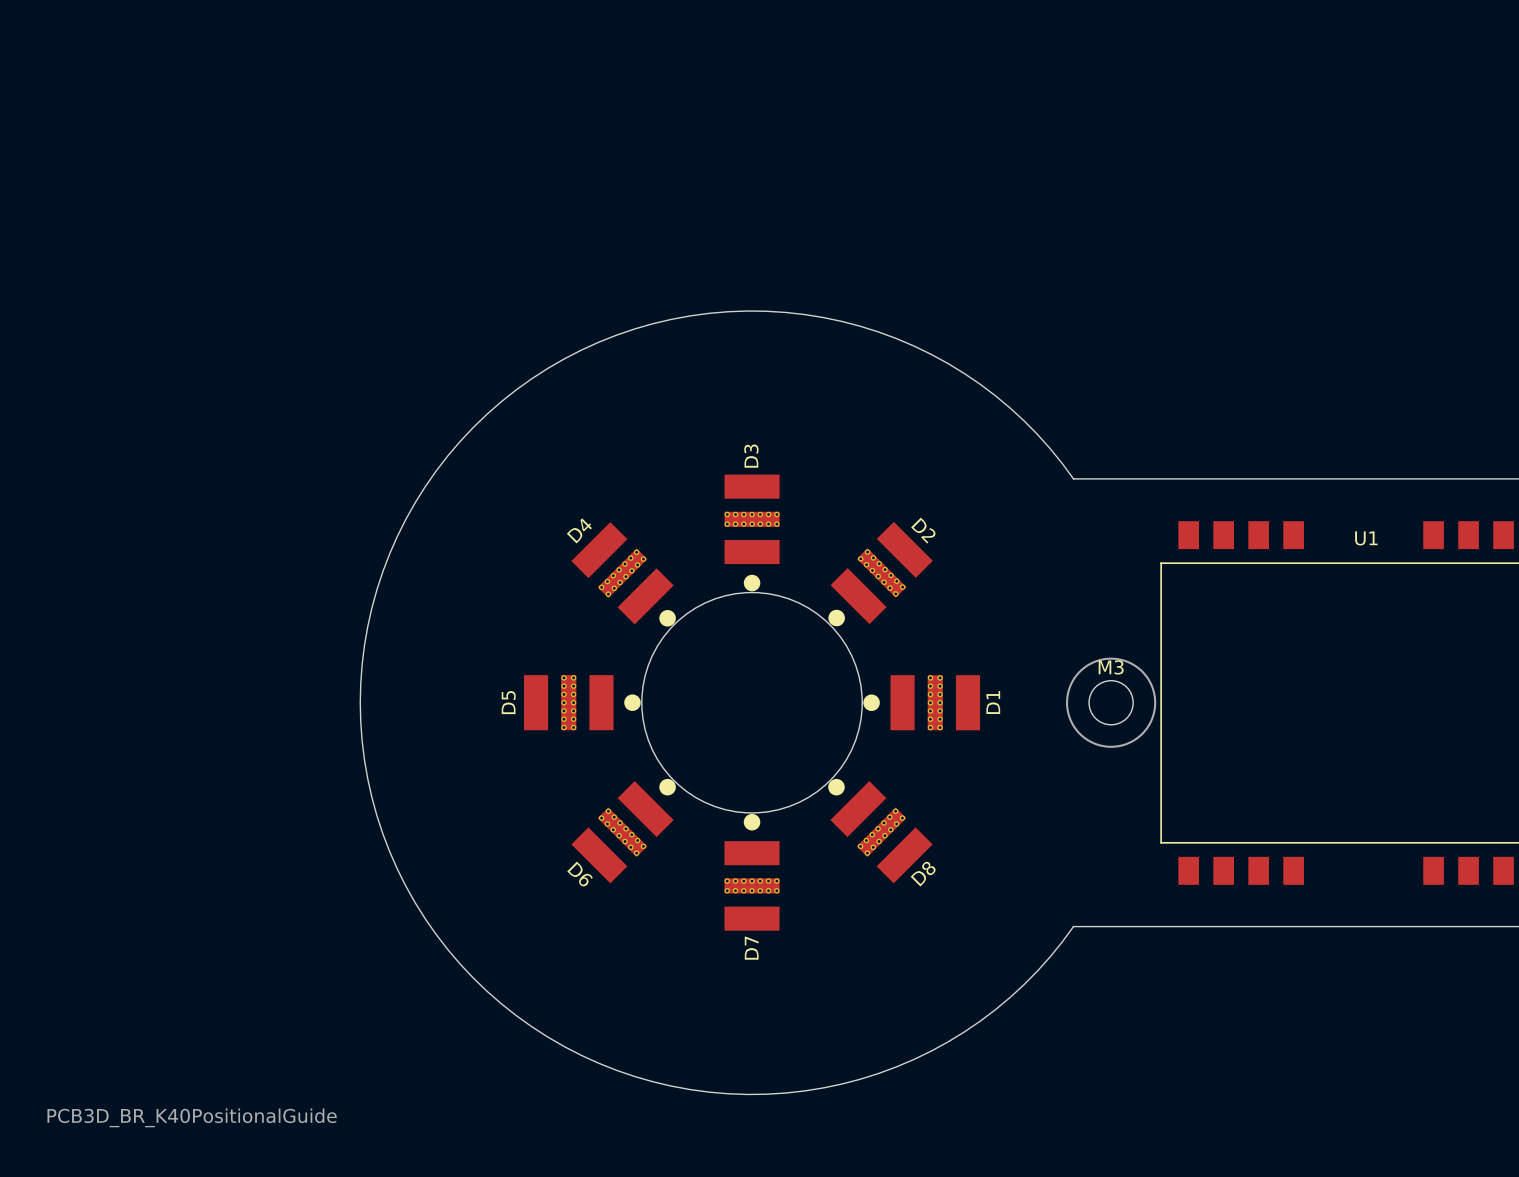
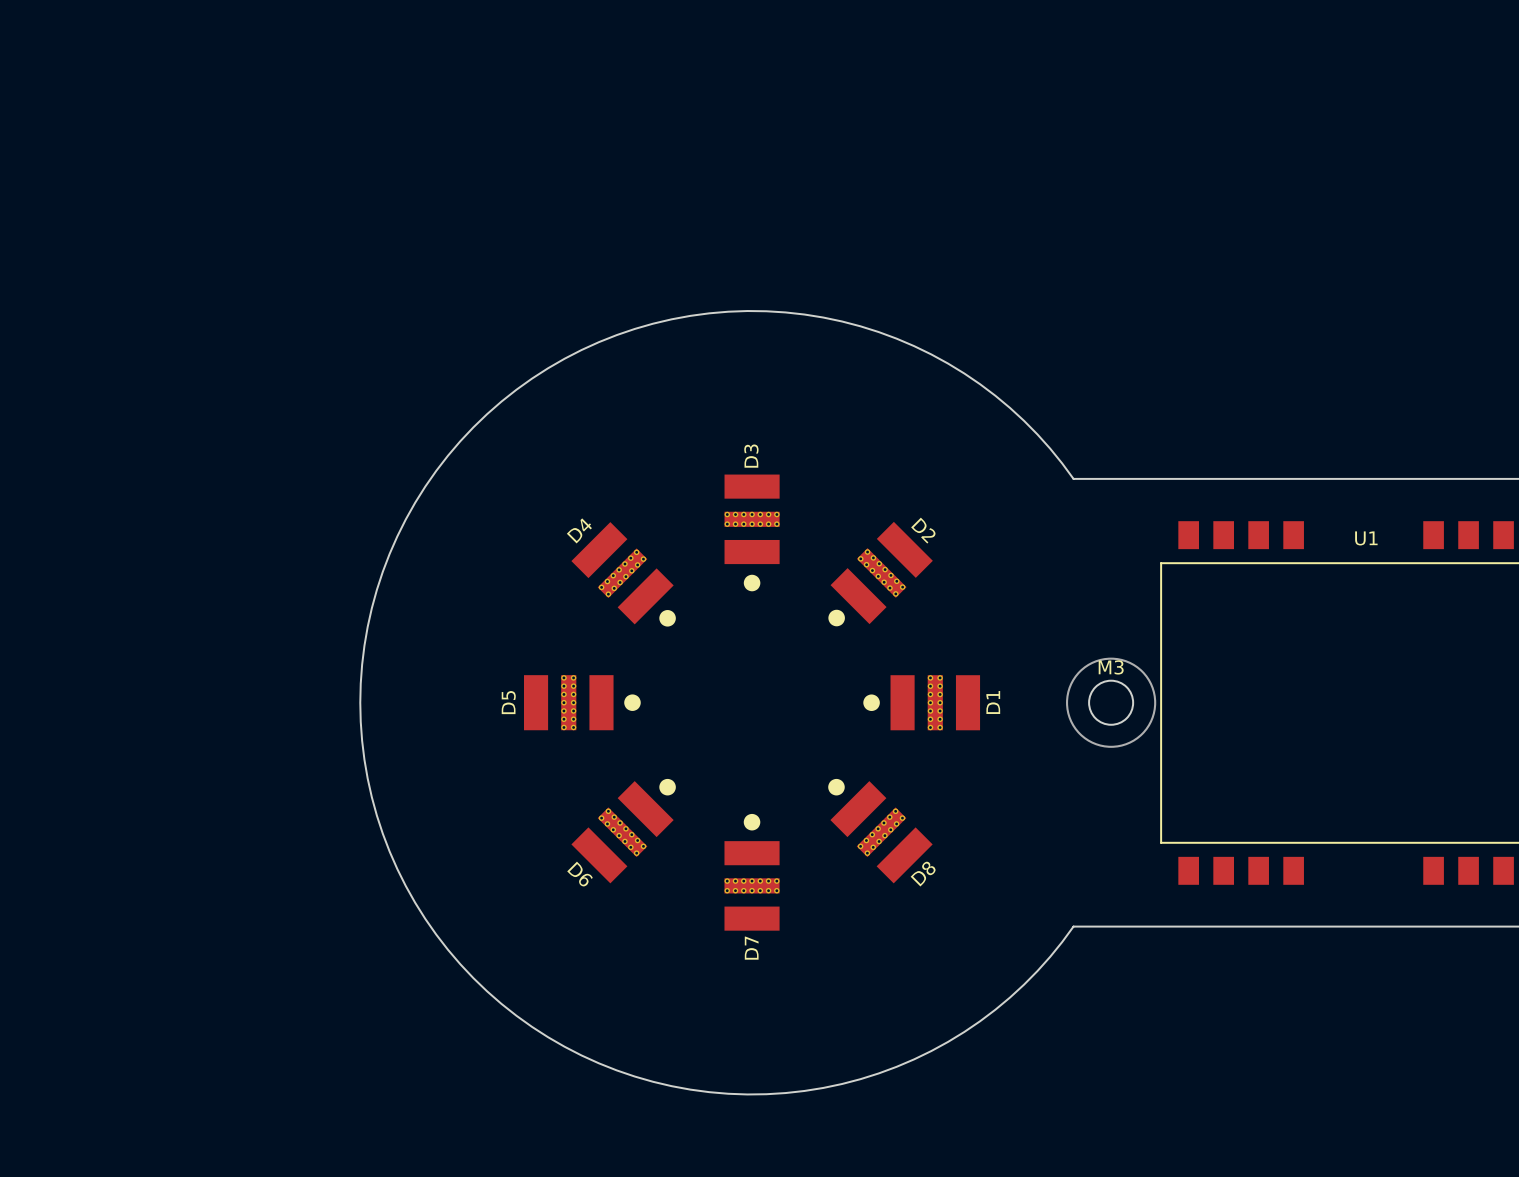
round board edge: [641, 592, 863, 814] -> none
text: PCB3D_BR_K40PositionalGuide (192, 1117) -> none

